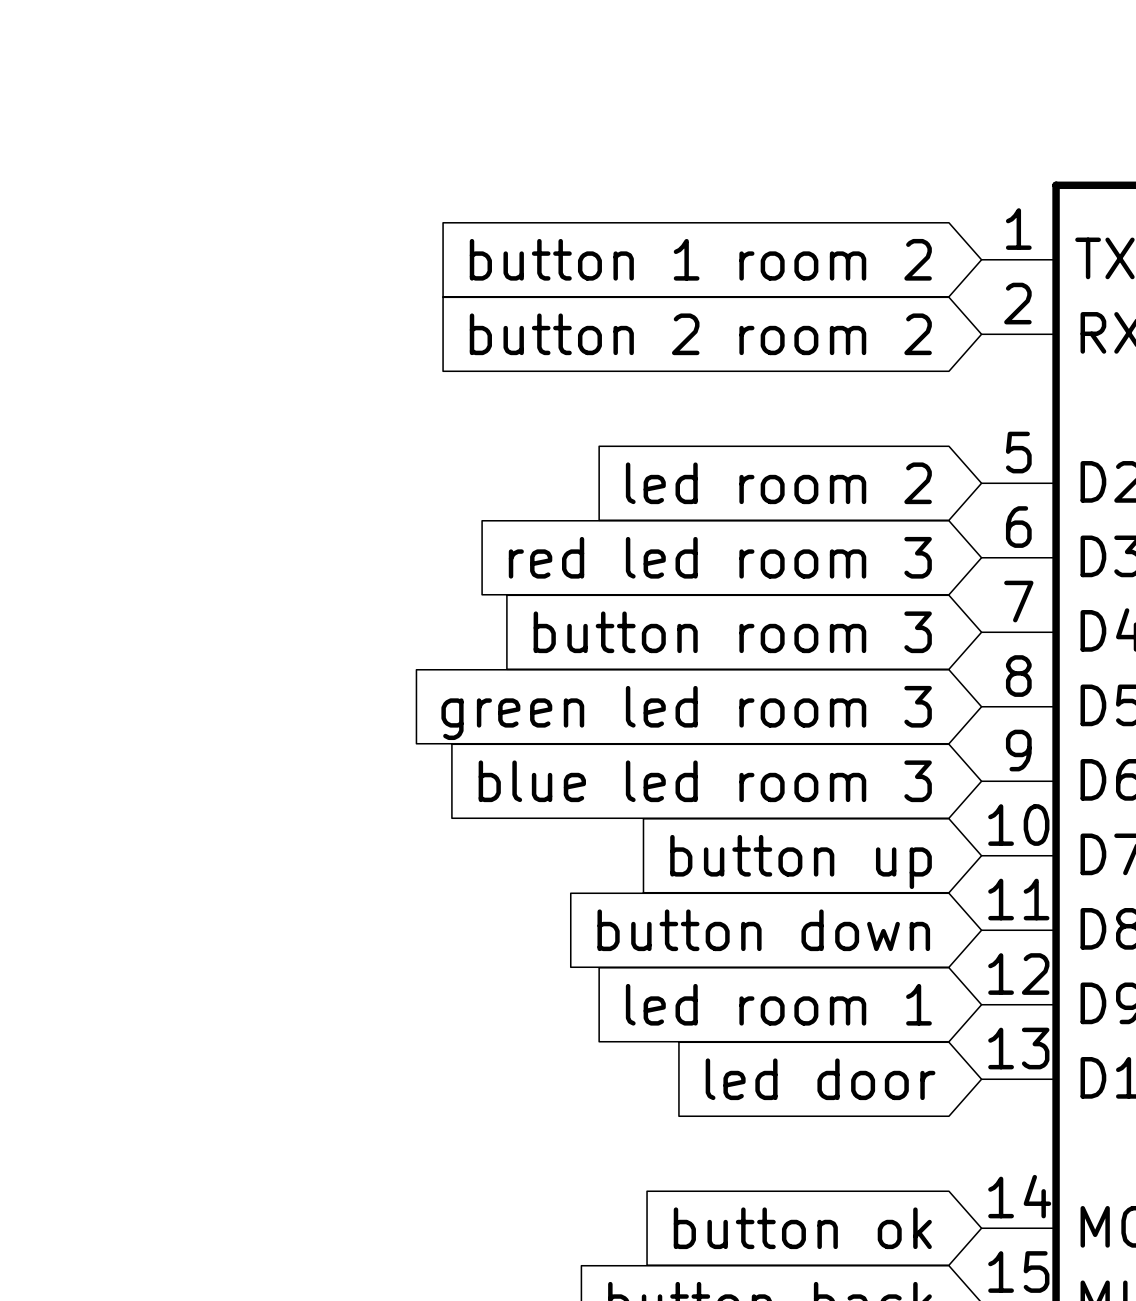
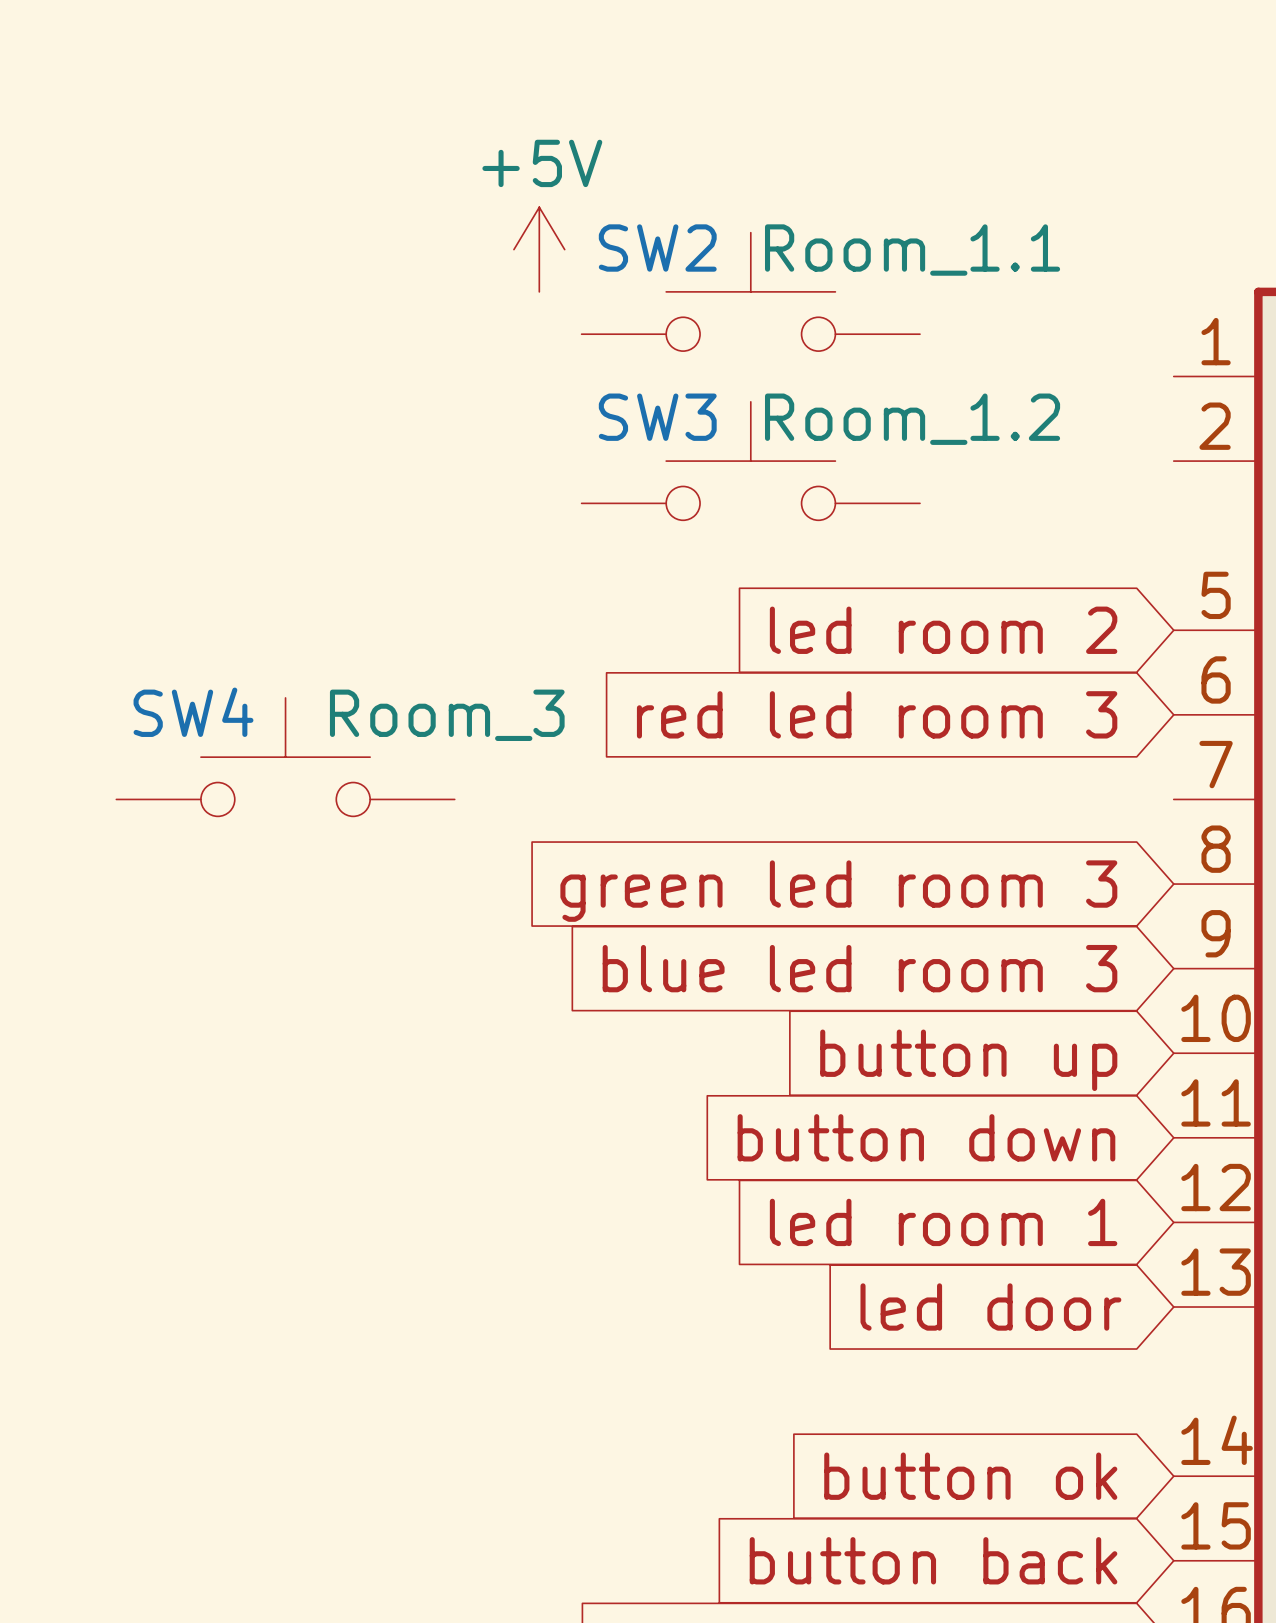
power symbol: none -> +5V (539, 249)
SW2: none -> Room_1.1 (750, 291)
global label: button 1 room 2 (700, 259) -> none
SW3: none -> Room_1.2 (750, 461)
global label: button 2 room 2 (700, 334) -> none
SW4: none -> Room_3 (285, 757)
global label: button room 3 (732, 632) -> none

